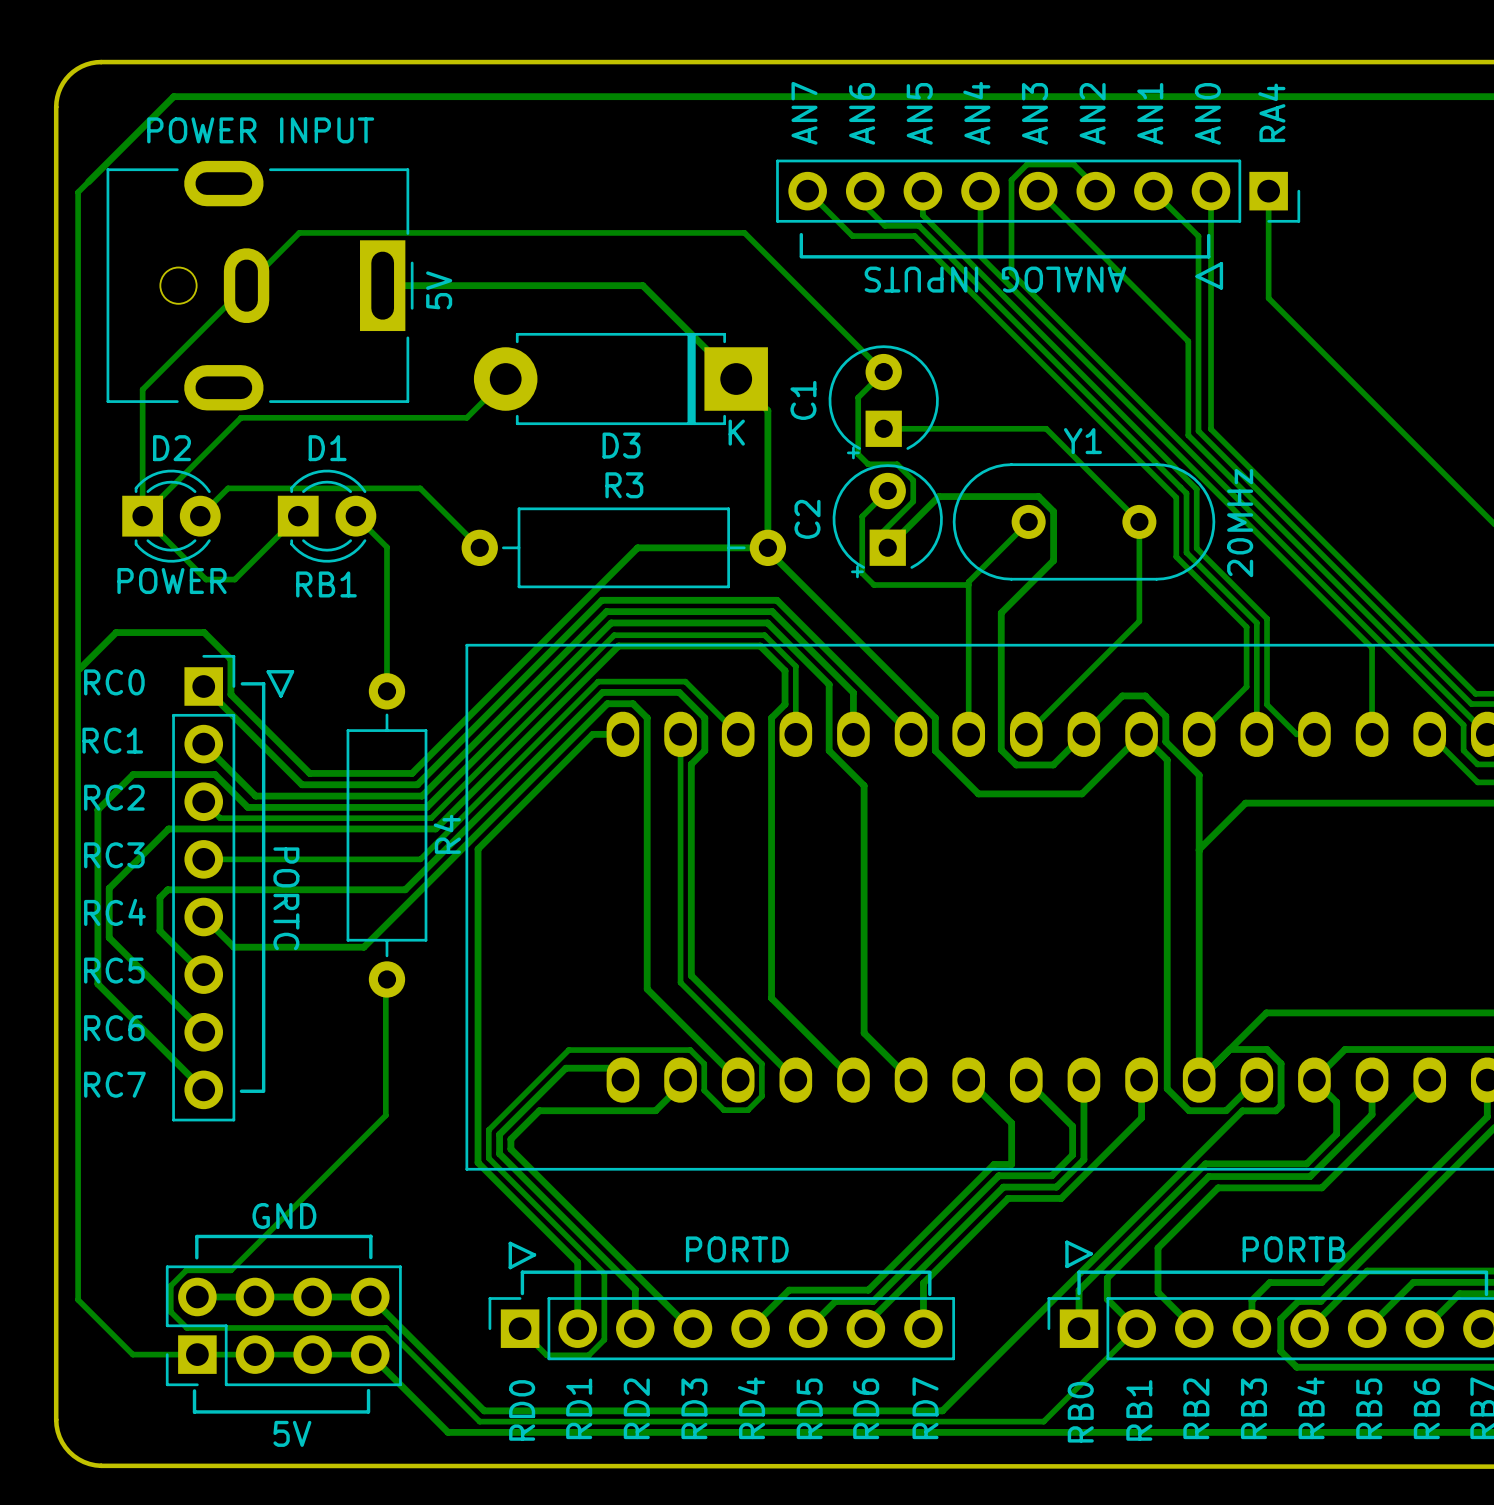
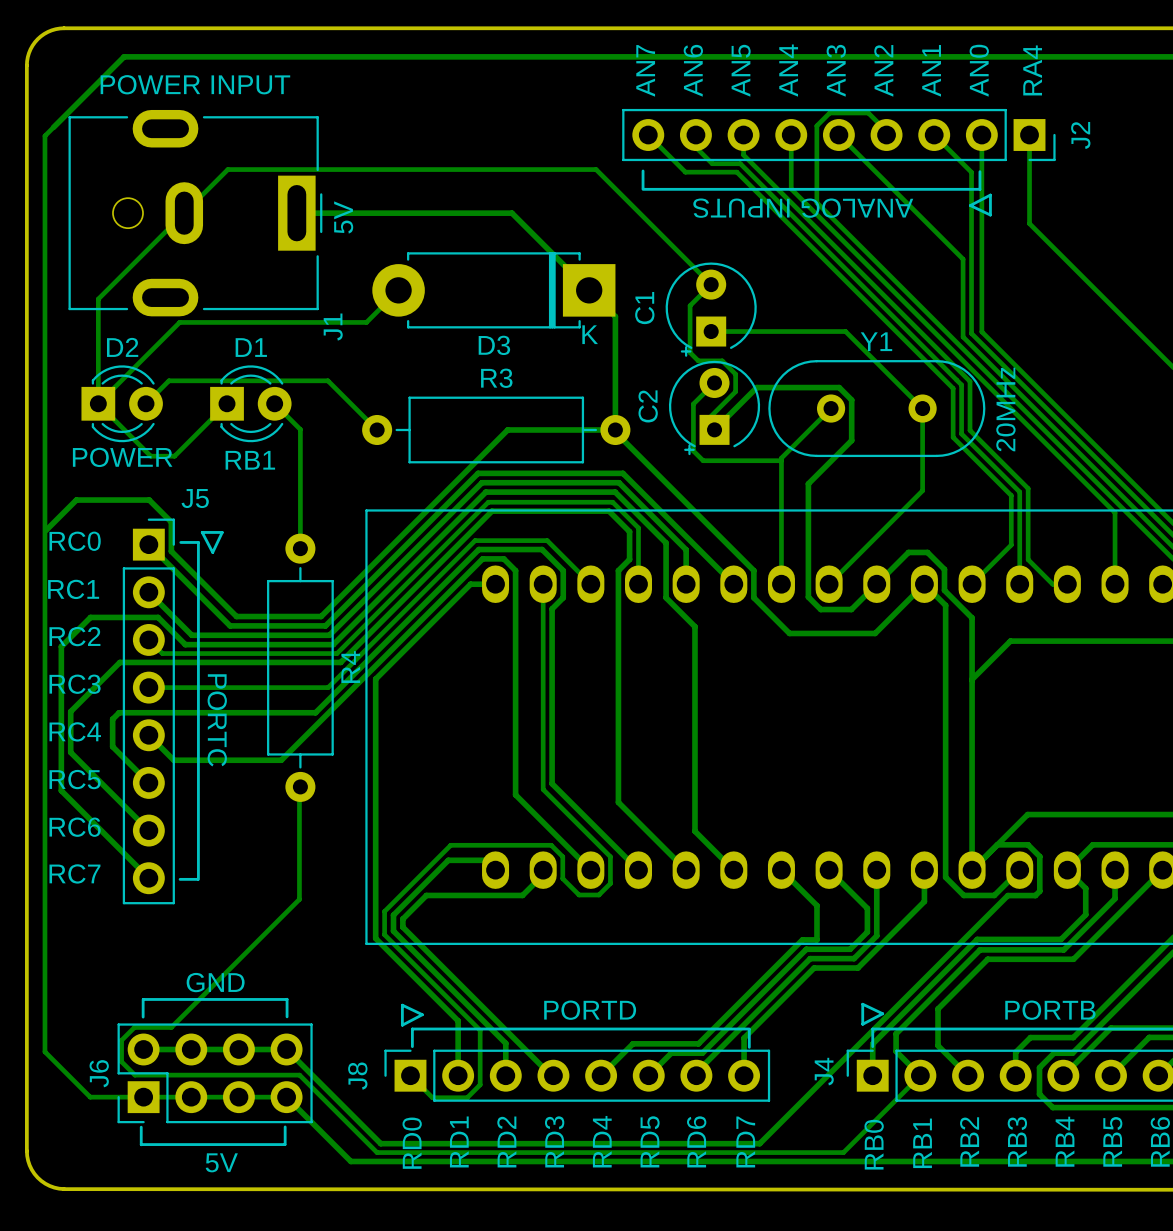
J2 name: none -> J2 (1080, 135)
J1 name: none -> J1 (333, 327)
J5 name: none -> J5 (195, 498)
J4 name: none -> J4 (824, 1071)
J6 name: none -> J6 (99, 1073)
J8 name: none -> J8 (357, 1076)

